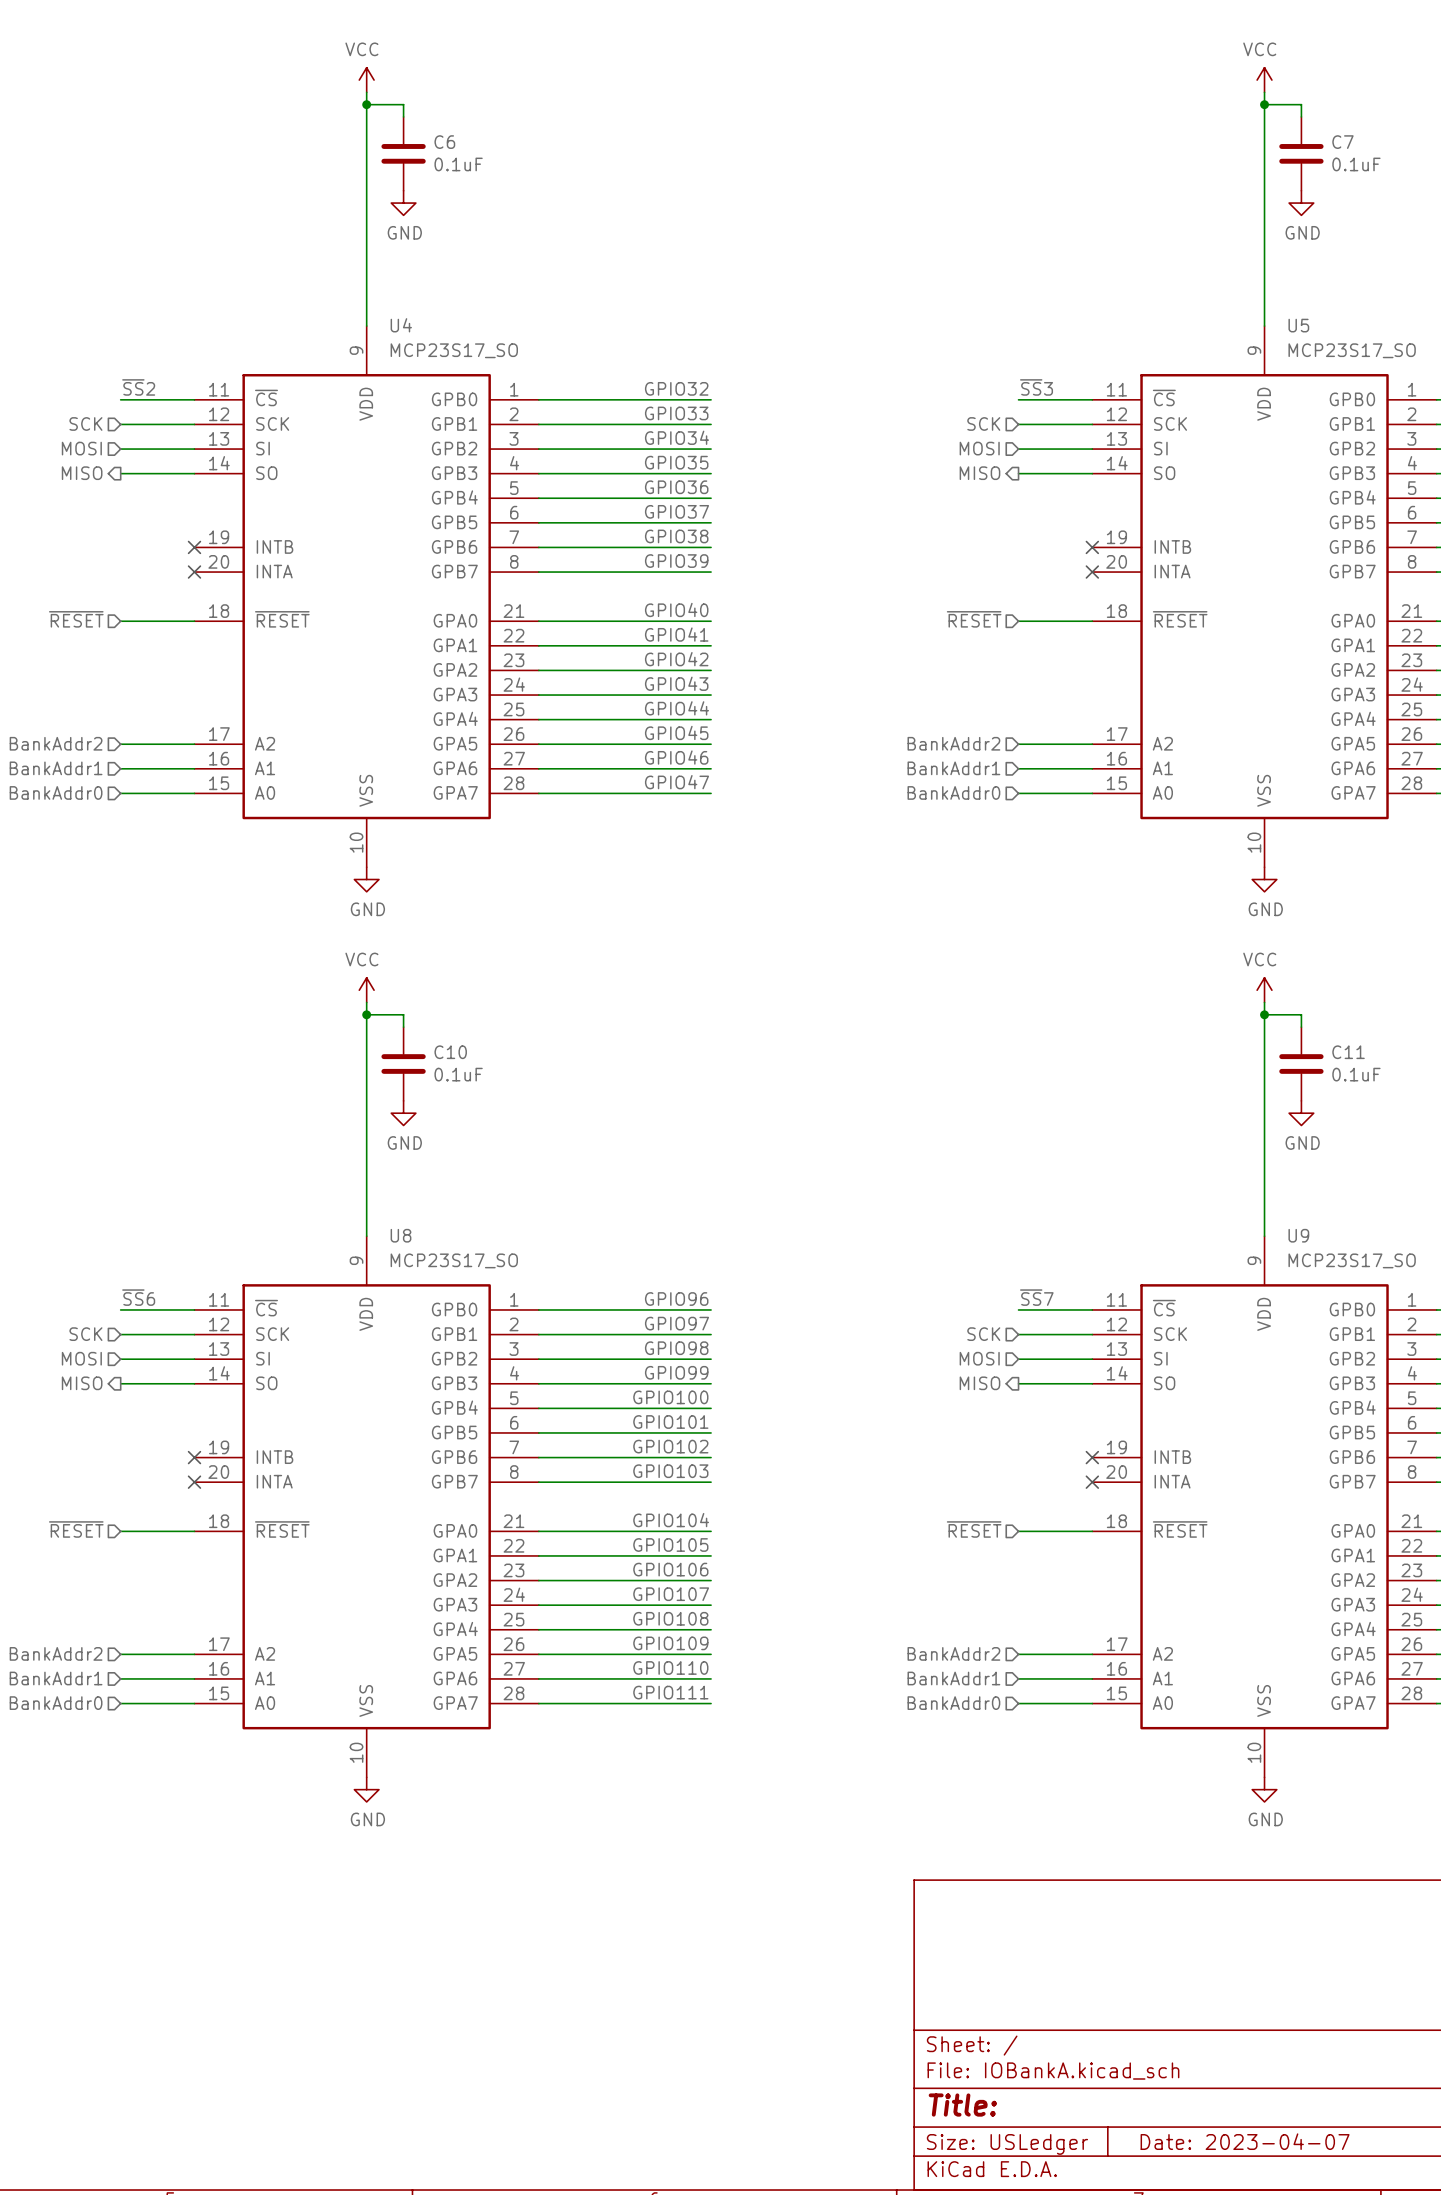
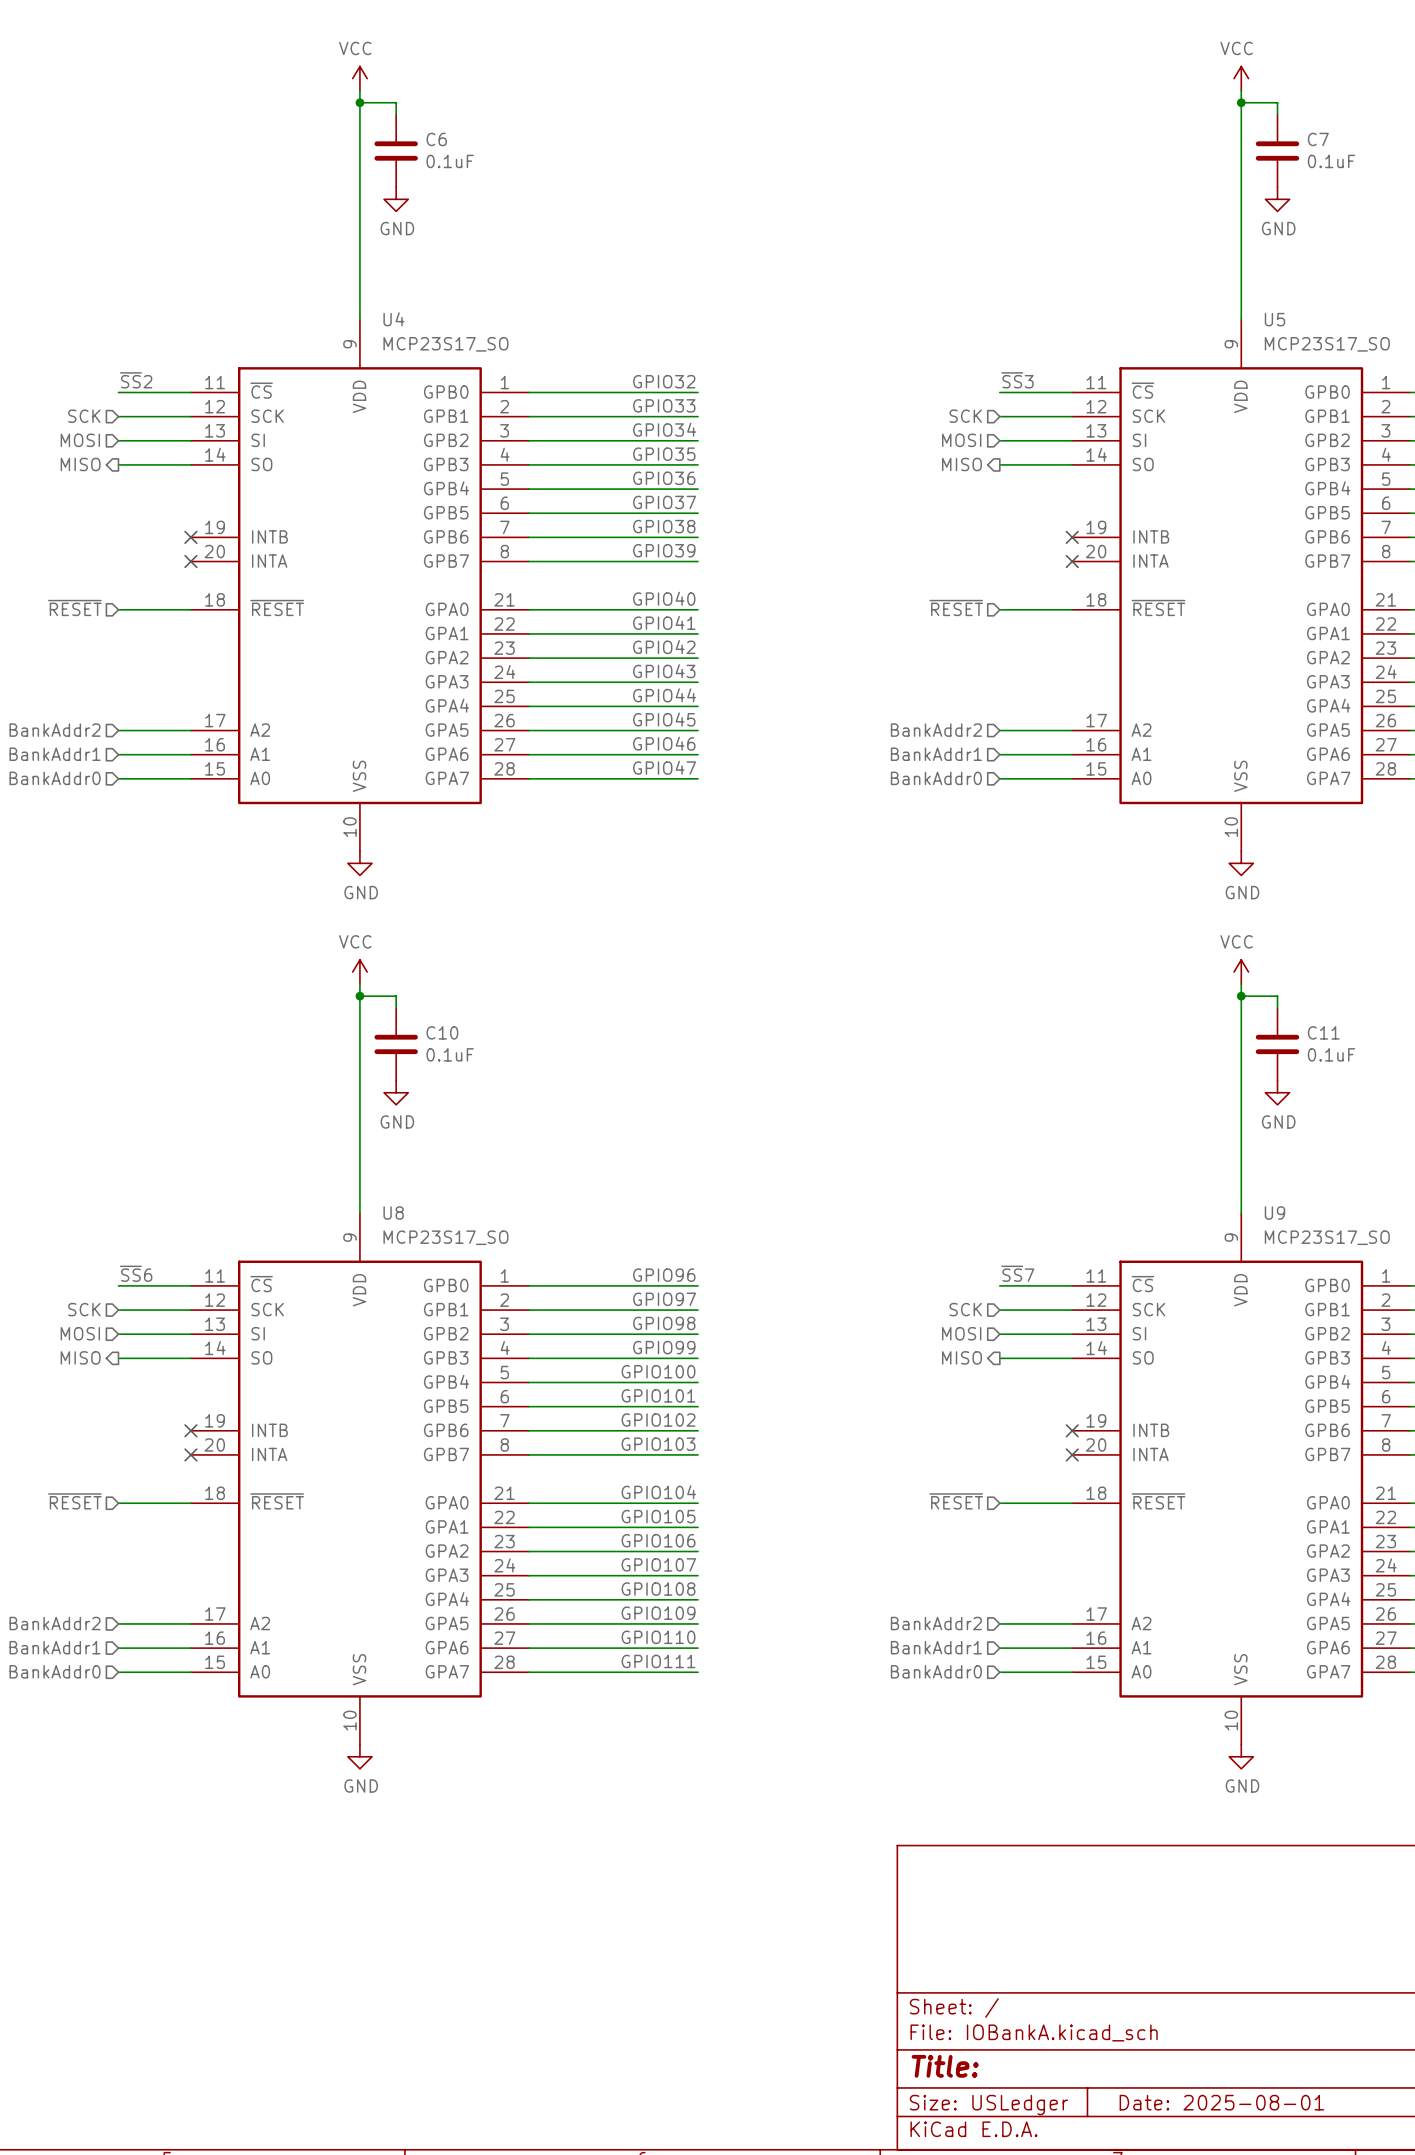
title block: Date: 2023-04-07 (1245, 2141) -> Date: 2025-08-01 (1221, 2102)

